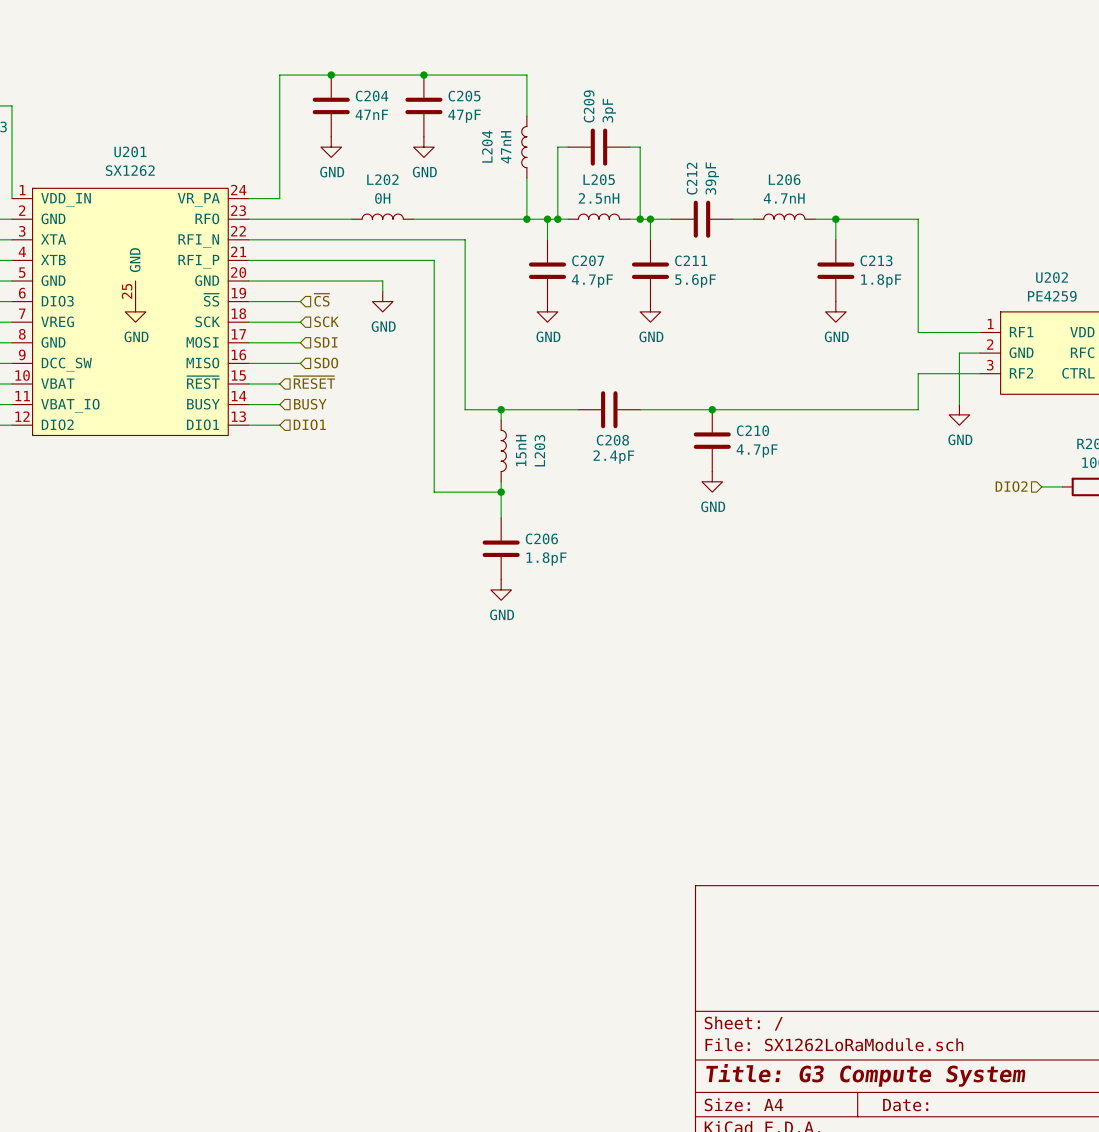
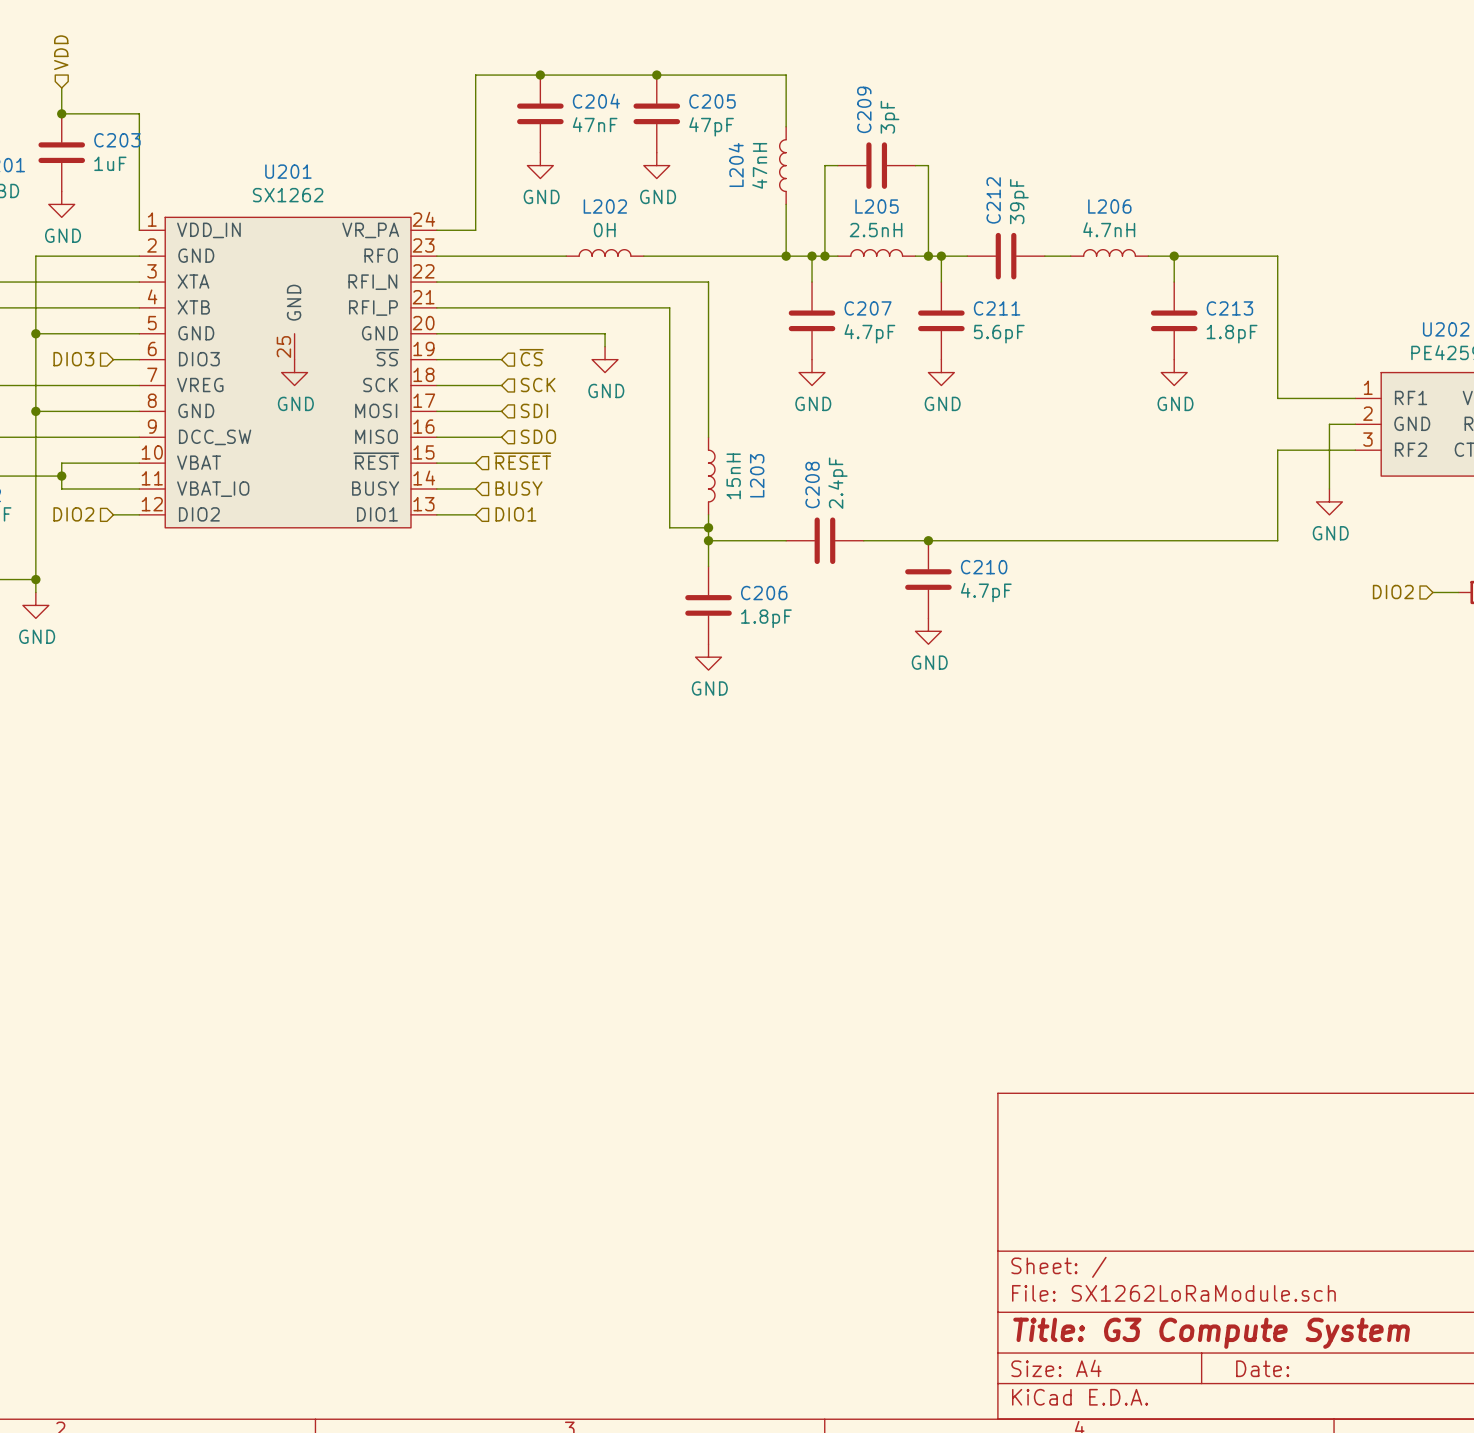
wire: (465, 363) (465, 409) (578, 409) -> none
wire: (501, 409) (501, 420) -> none
junction: (501, 409) -> none
C208 position: (609, 409) -> (824, 540)
wire: (640, 409) (918, 409) -> (863, 540) (1277, 540) (1277, 495)
junction: (712, 409) -> none
wire: none -> (708, 514) (708, 566)
wire: (434, 435) (434, 492) (501, 492) -> (669, 527) (708, 527)
junction: none -> (708, 527)
C208 name rotation: 0° (612, 440) -> 90° counterclockwise (812, 485)
C208 name position: C208 (612, 440) -> C208 (812, 485)
C210 position: (712, 440) -> (928, 579)
wire: none -> (708, 540) (786, 540)
junction: none -> (708, 540)
junction: none -> (928, 540)
L203 position: (503, 450) -> (711, 476)
C208 value rotation: 0° (613, 457) -> 90° counterclockwise (837, 483)
C208 value position: 2.4pF (613, 457) -> 2.4pF (837, 483)
wire: (501, 481) (501, 517) -> none
power symbol: GND (712, 481) -> none
junction: (501, 492) -> none
power symbol: none -> GND (928, 631)
C206 position: (501, 548) -> (708, 605)
power symbol position: GND (501, 589) -> GND (708, 657)

